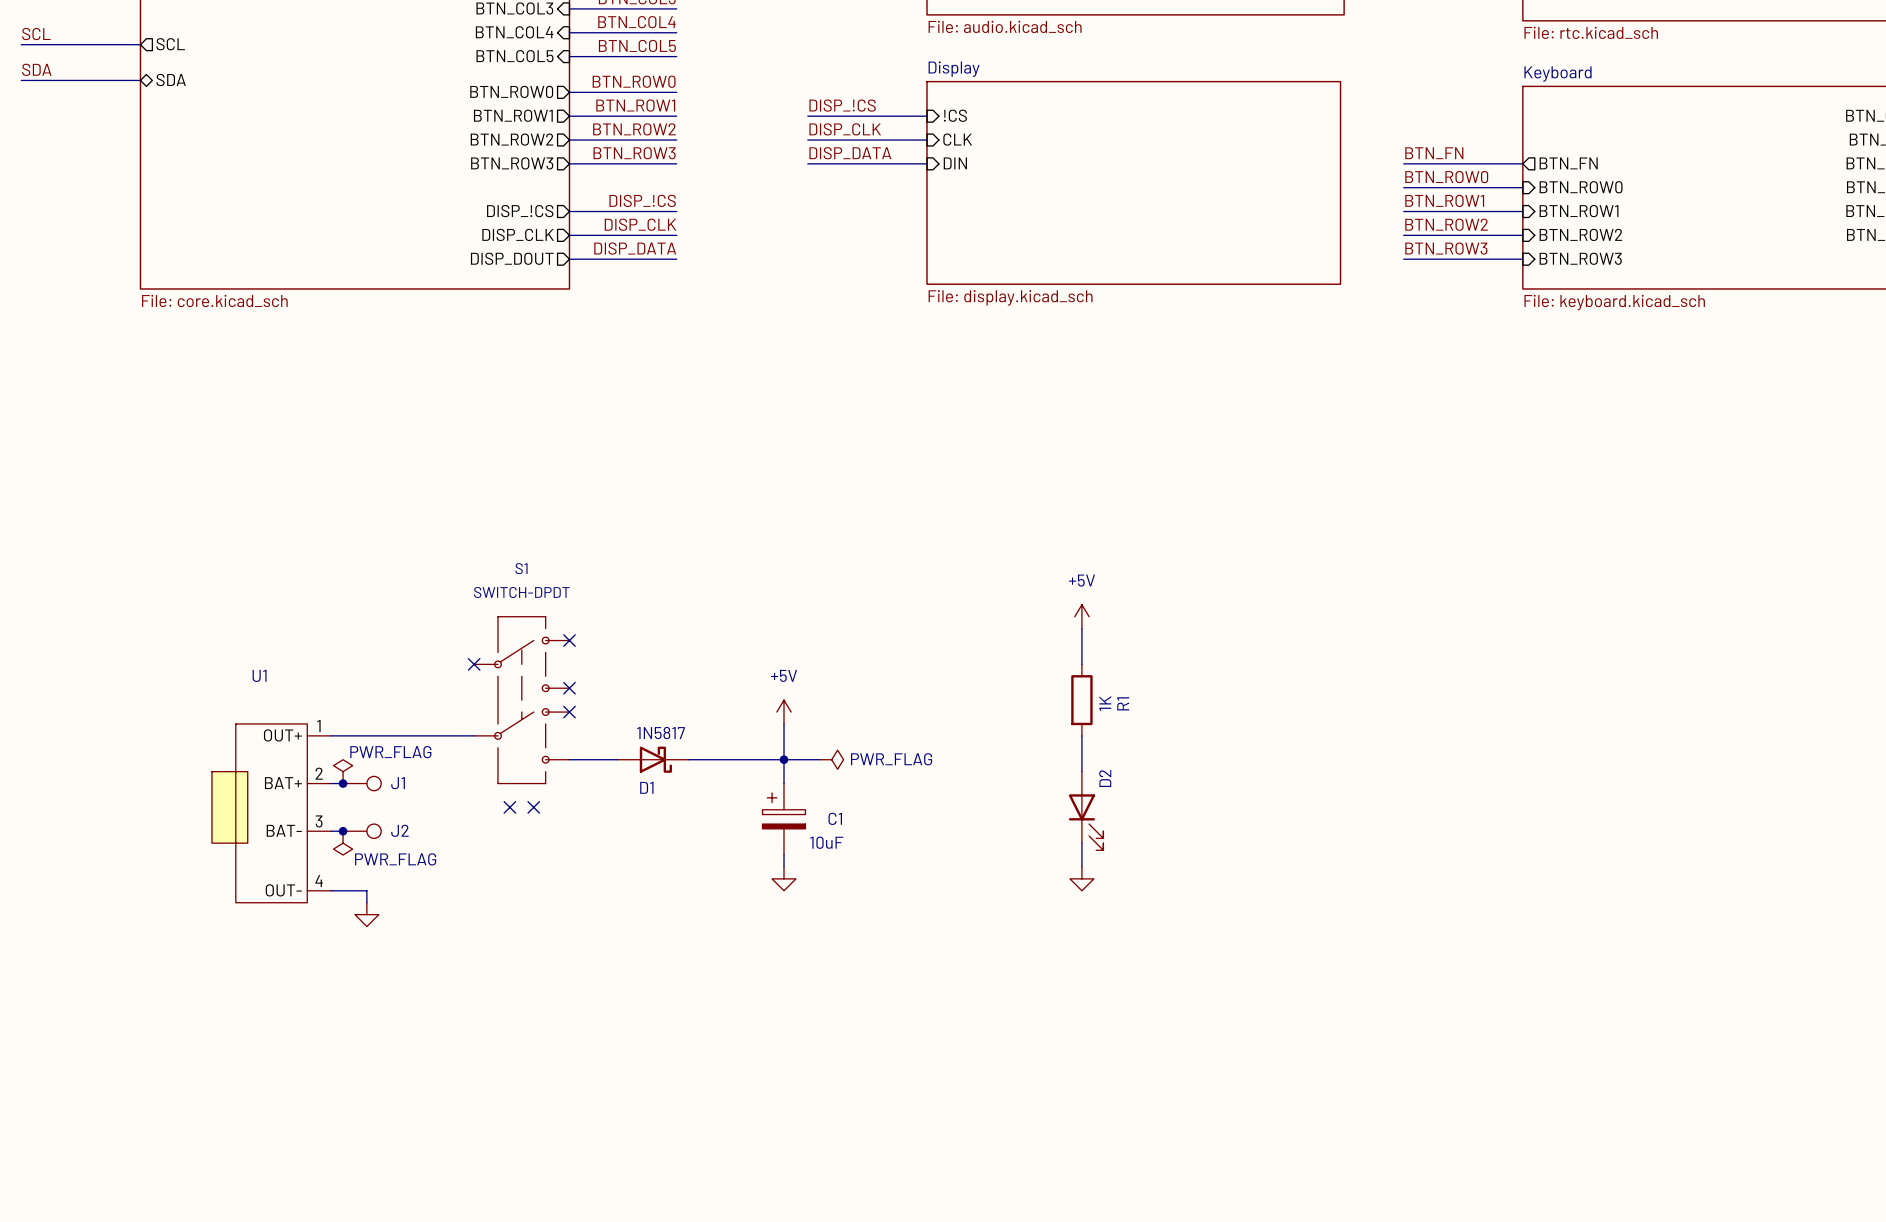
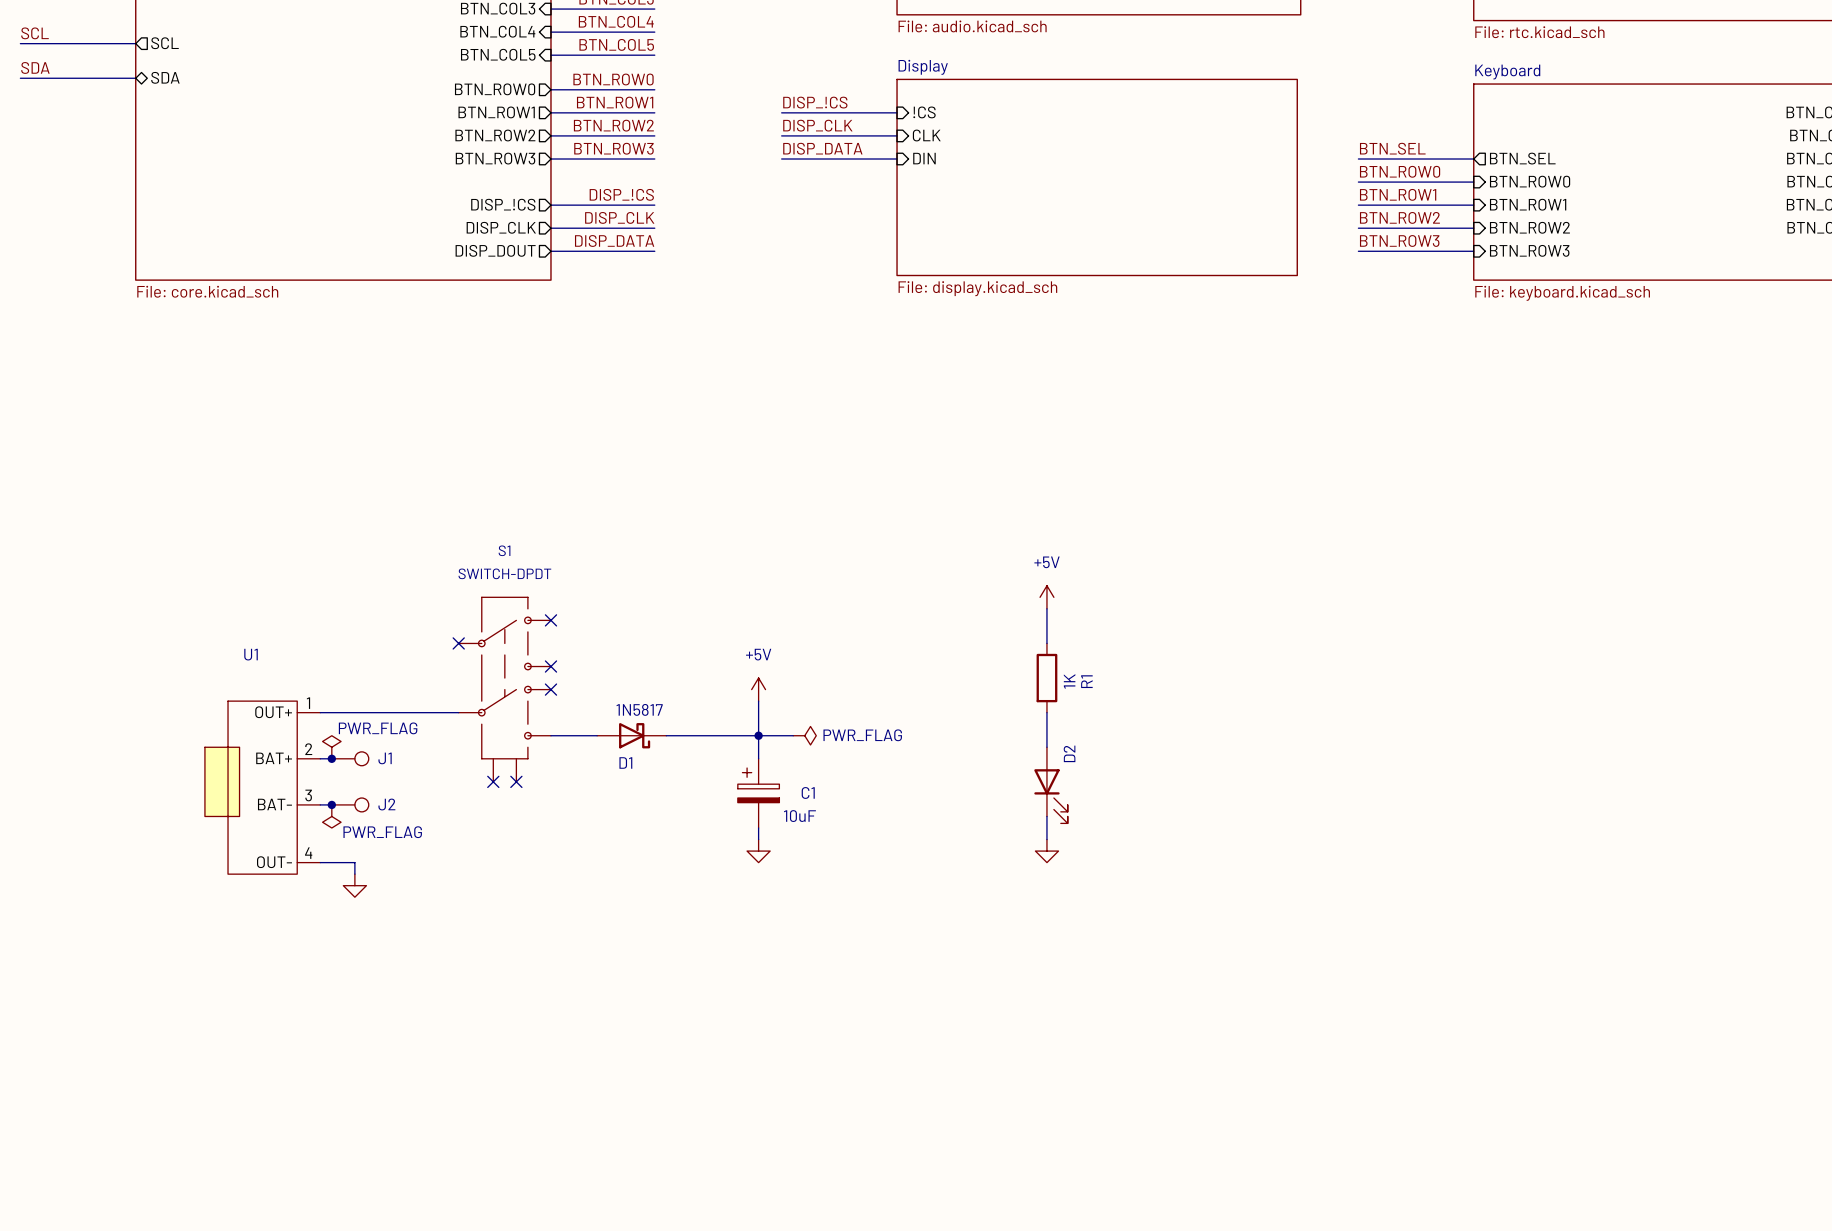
label: BTN_FN (1434, 153) -> BTN_SEL (1392, 148)
sheet pin: BTN_FN (1568, 163) -> BTN_SEL (1522, 158)
S1 symbol: [474, 616, 570, 784] -> [458, 597, 551, 782]

